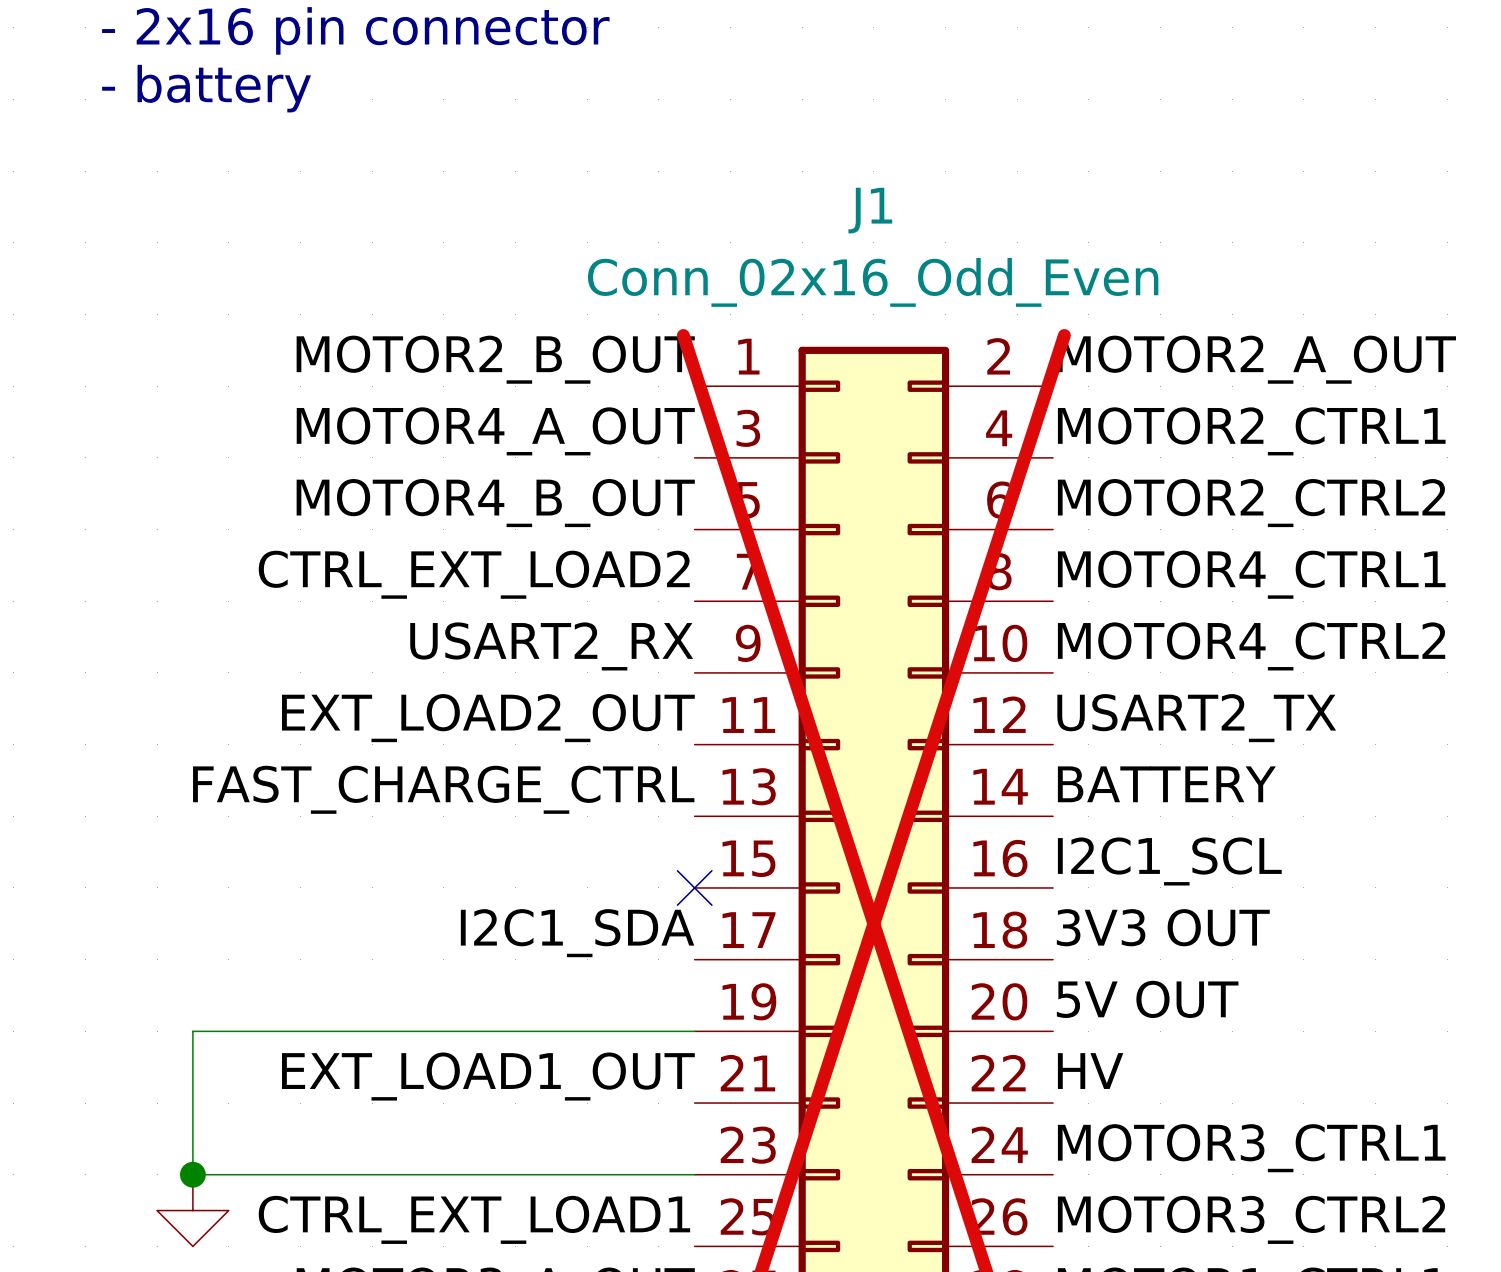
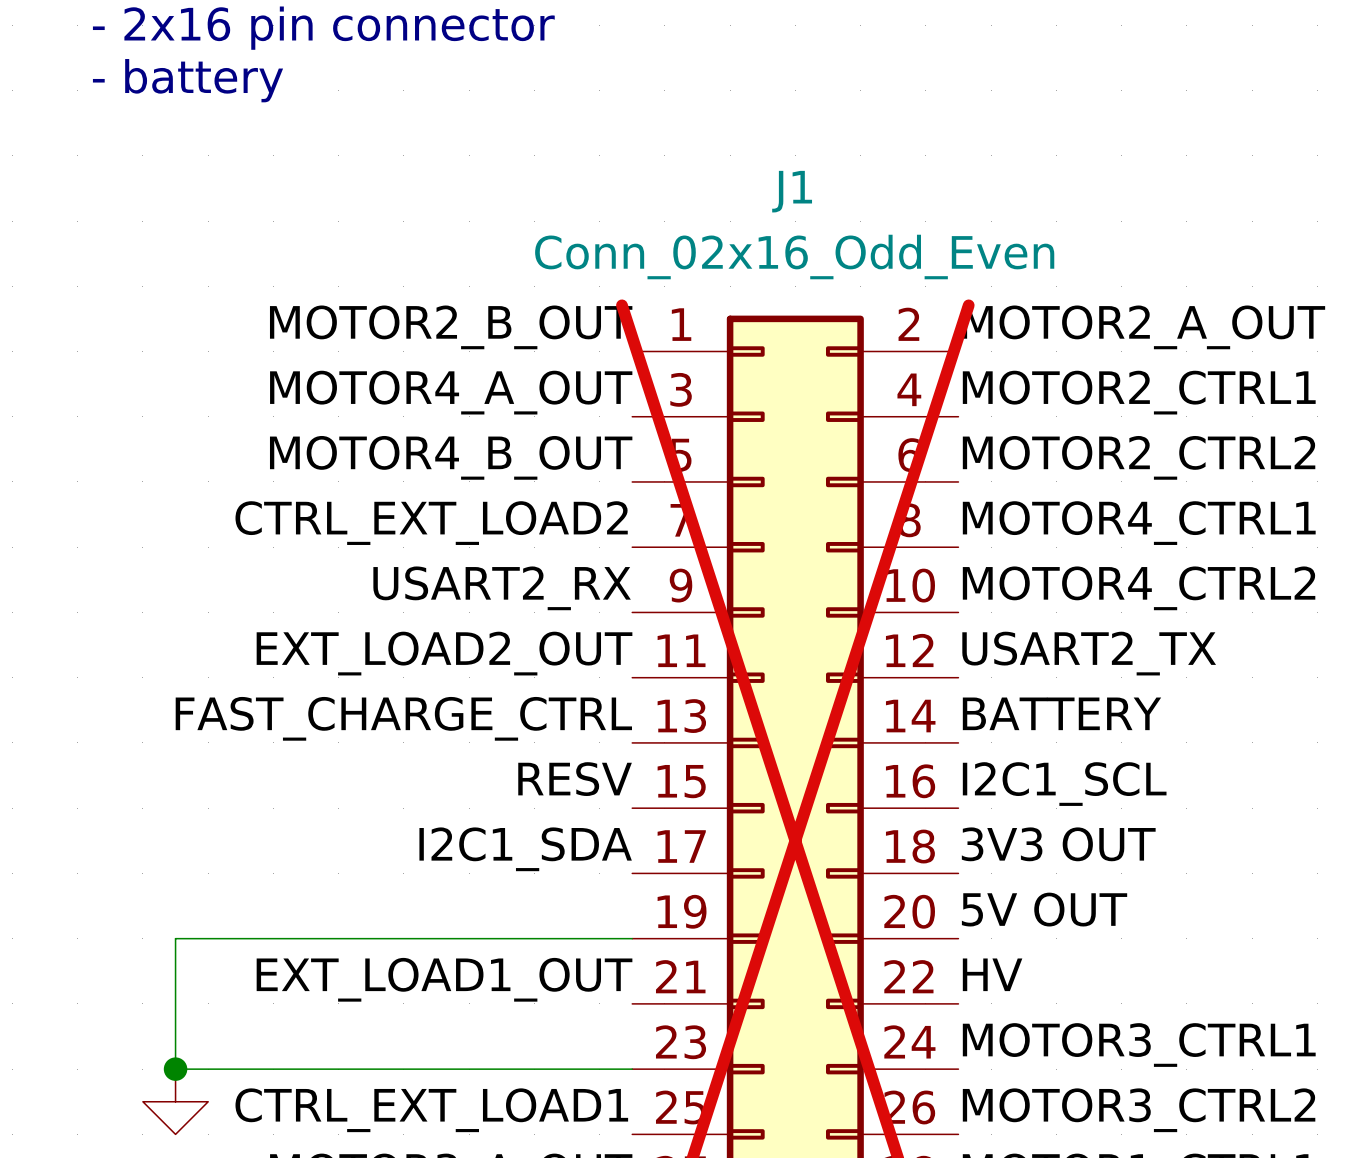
label: none -> RESV (575, 779)
no-connect mark: (694, 887) -> none

